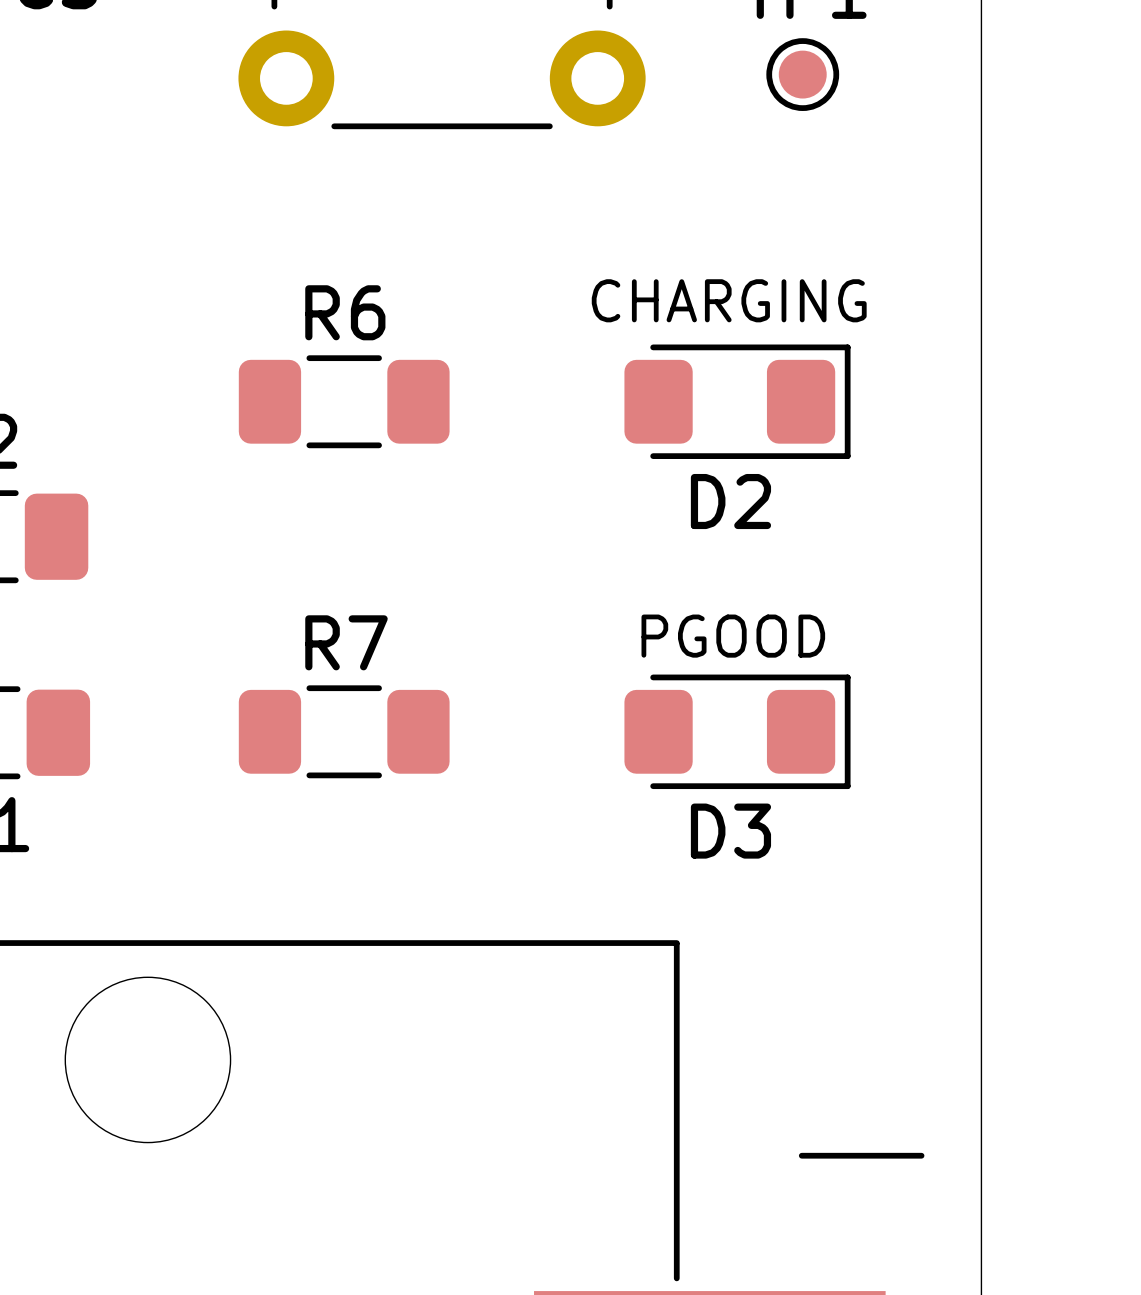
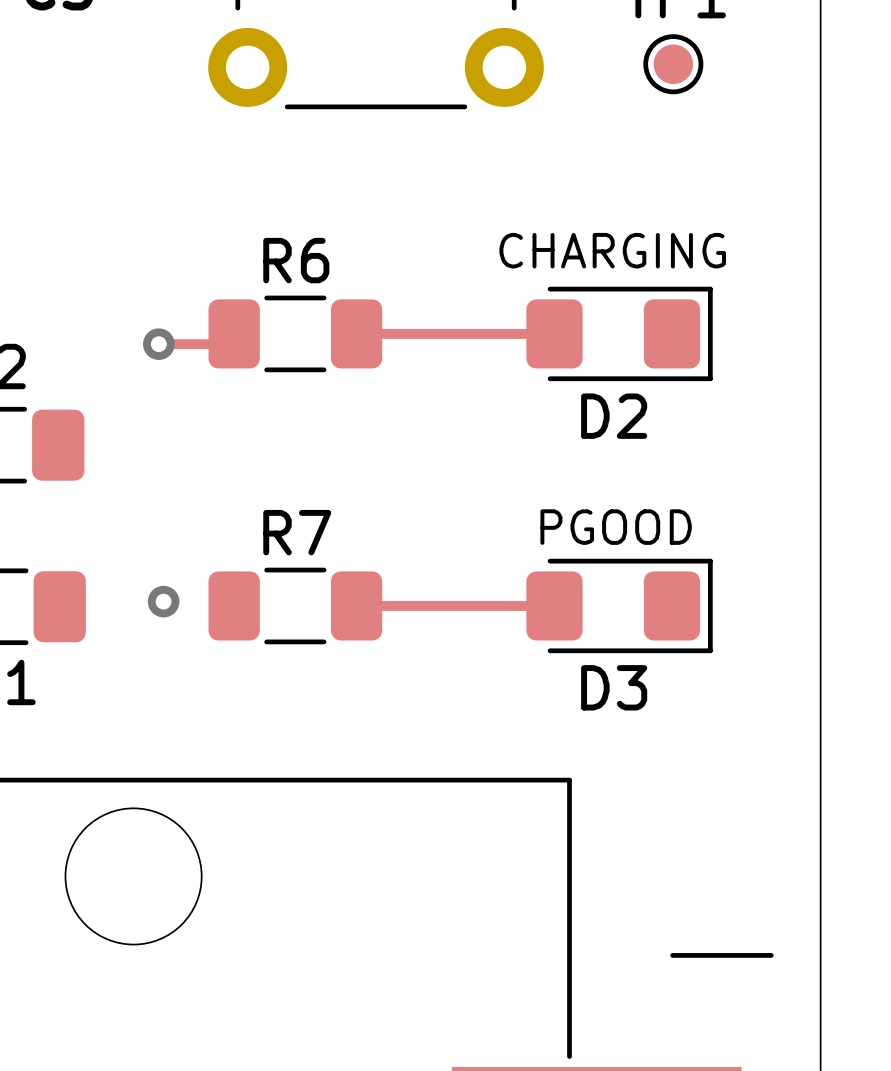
track: none -> (234, 333) (223, 344) (158, 344)
track: none -> (356, 333) (554, 333)
via: none -> (158, 344)
via: none -> (163, 601)
track: none -> (356, 605) (554, 605)

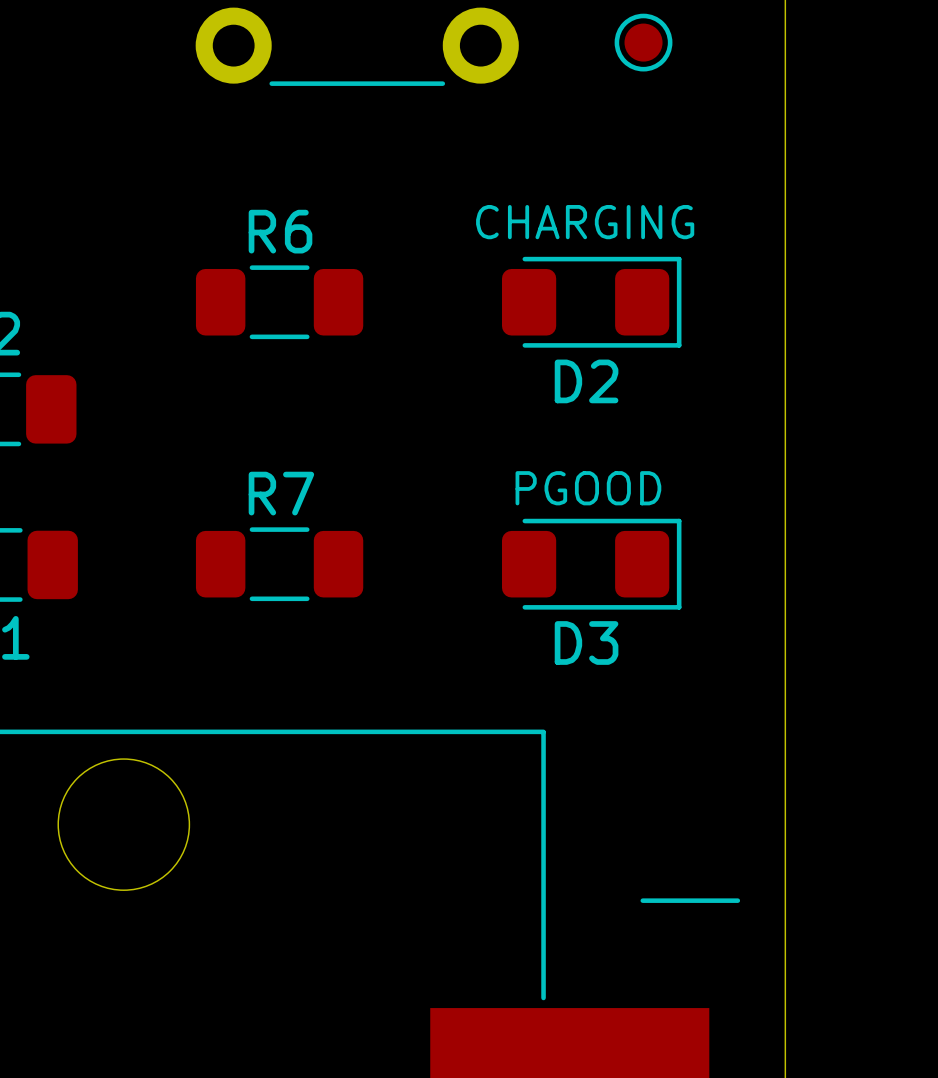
track: (234, 333) (223, 344) (158, 344) -> none
track: (356, 333) (554, 333) -> none
via: (158, 344) -> none
via: (163, 601) -> none
track: (356, 605) (554, 605) -> none

